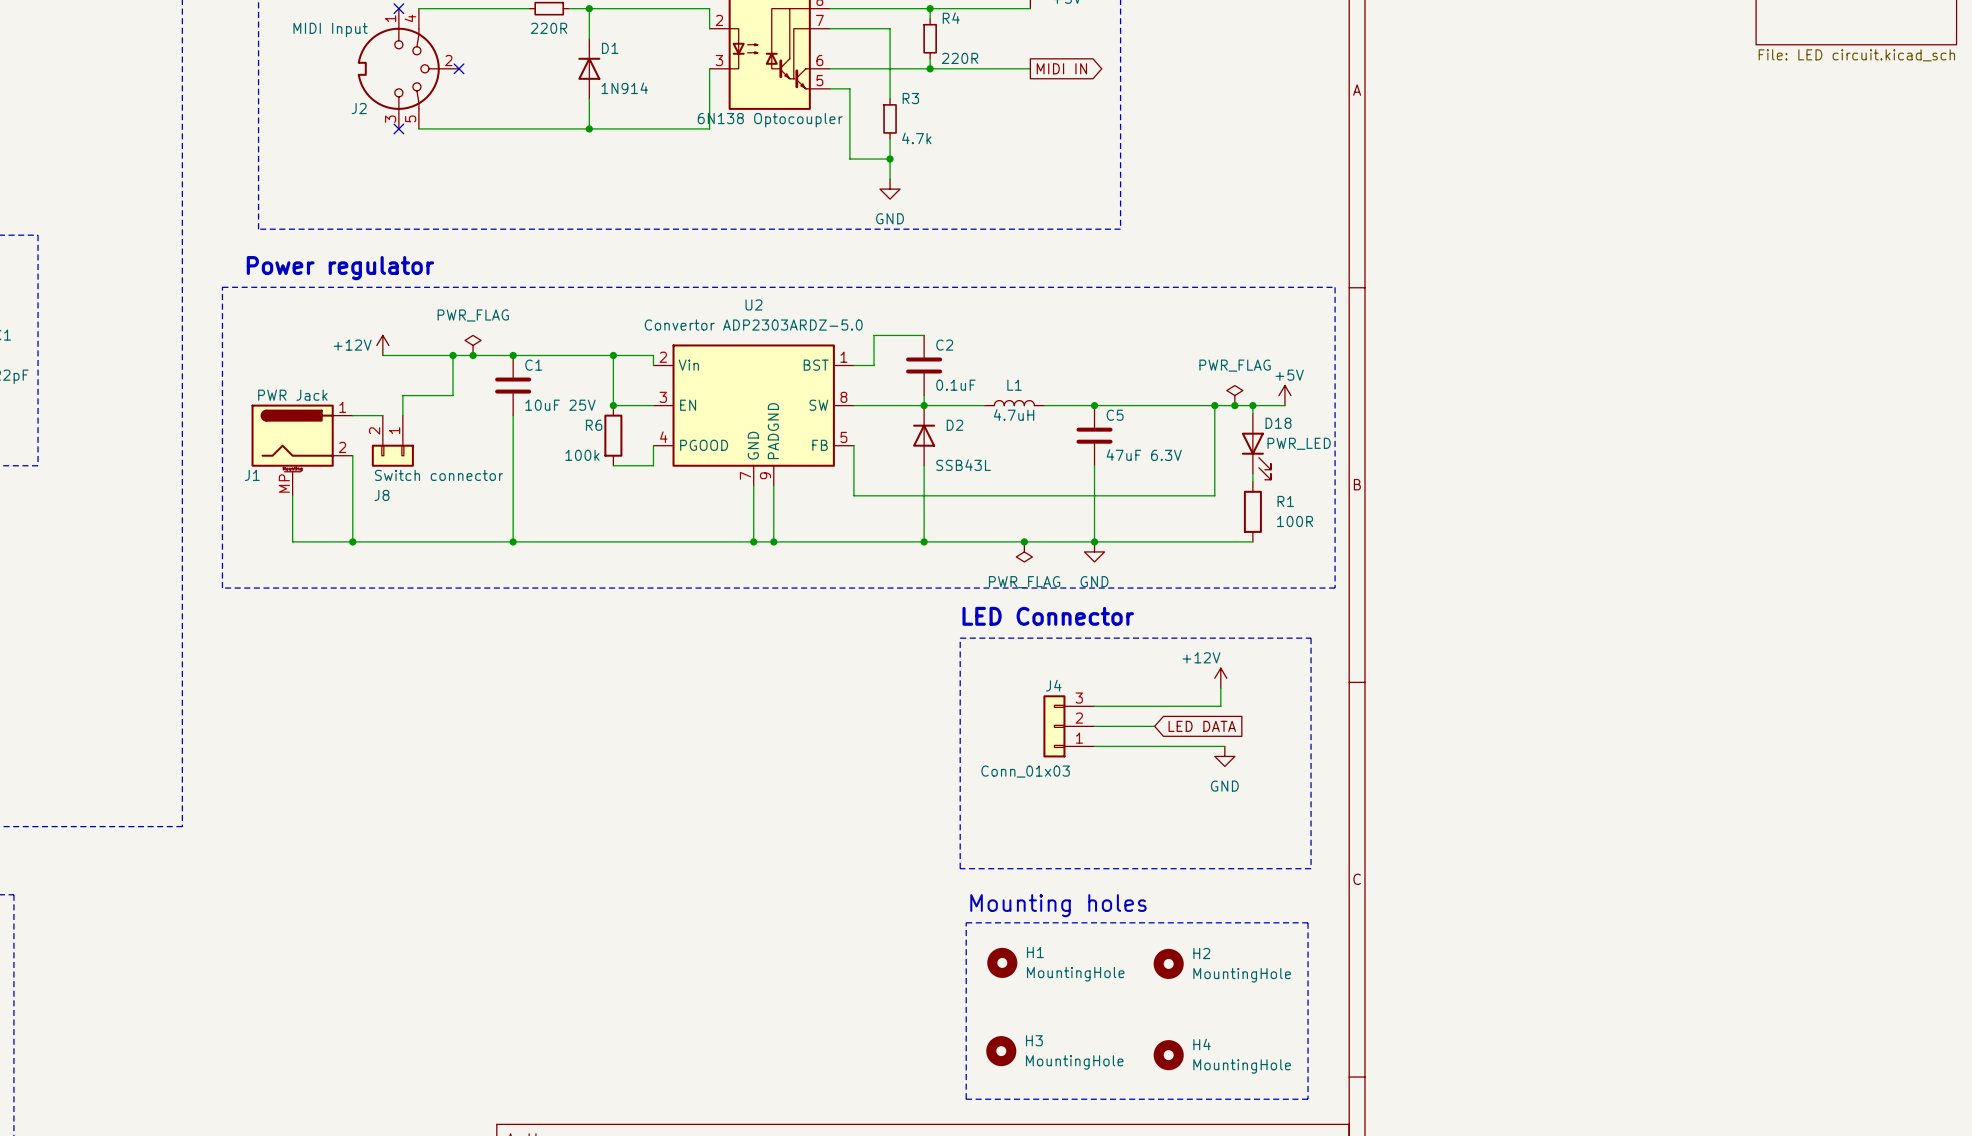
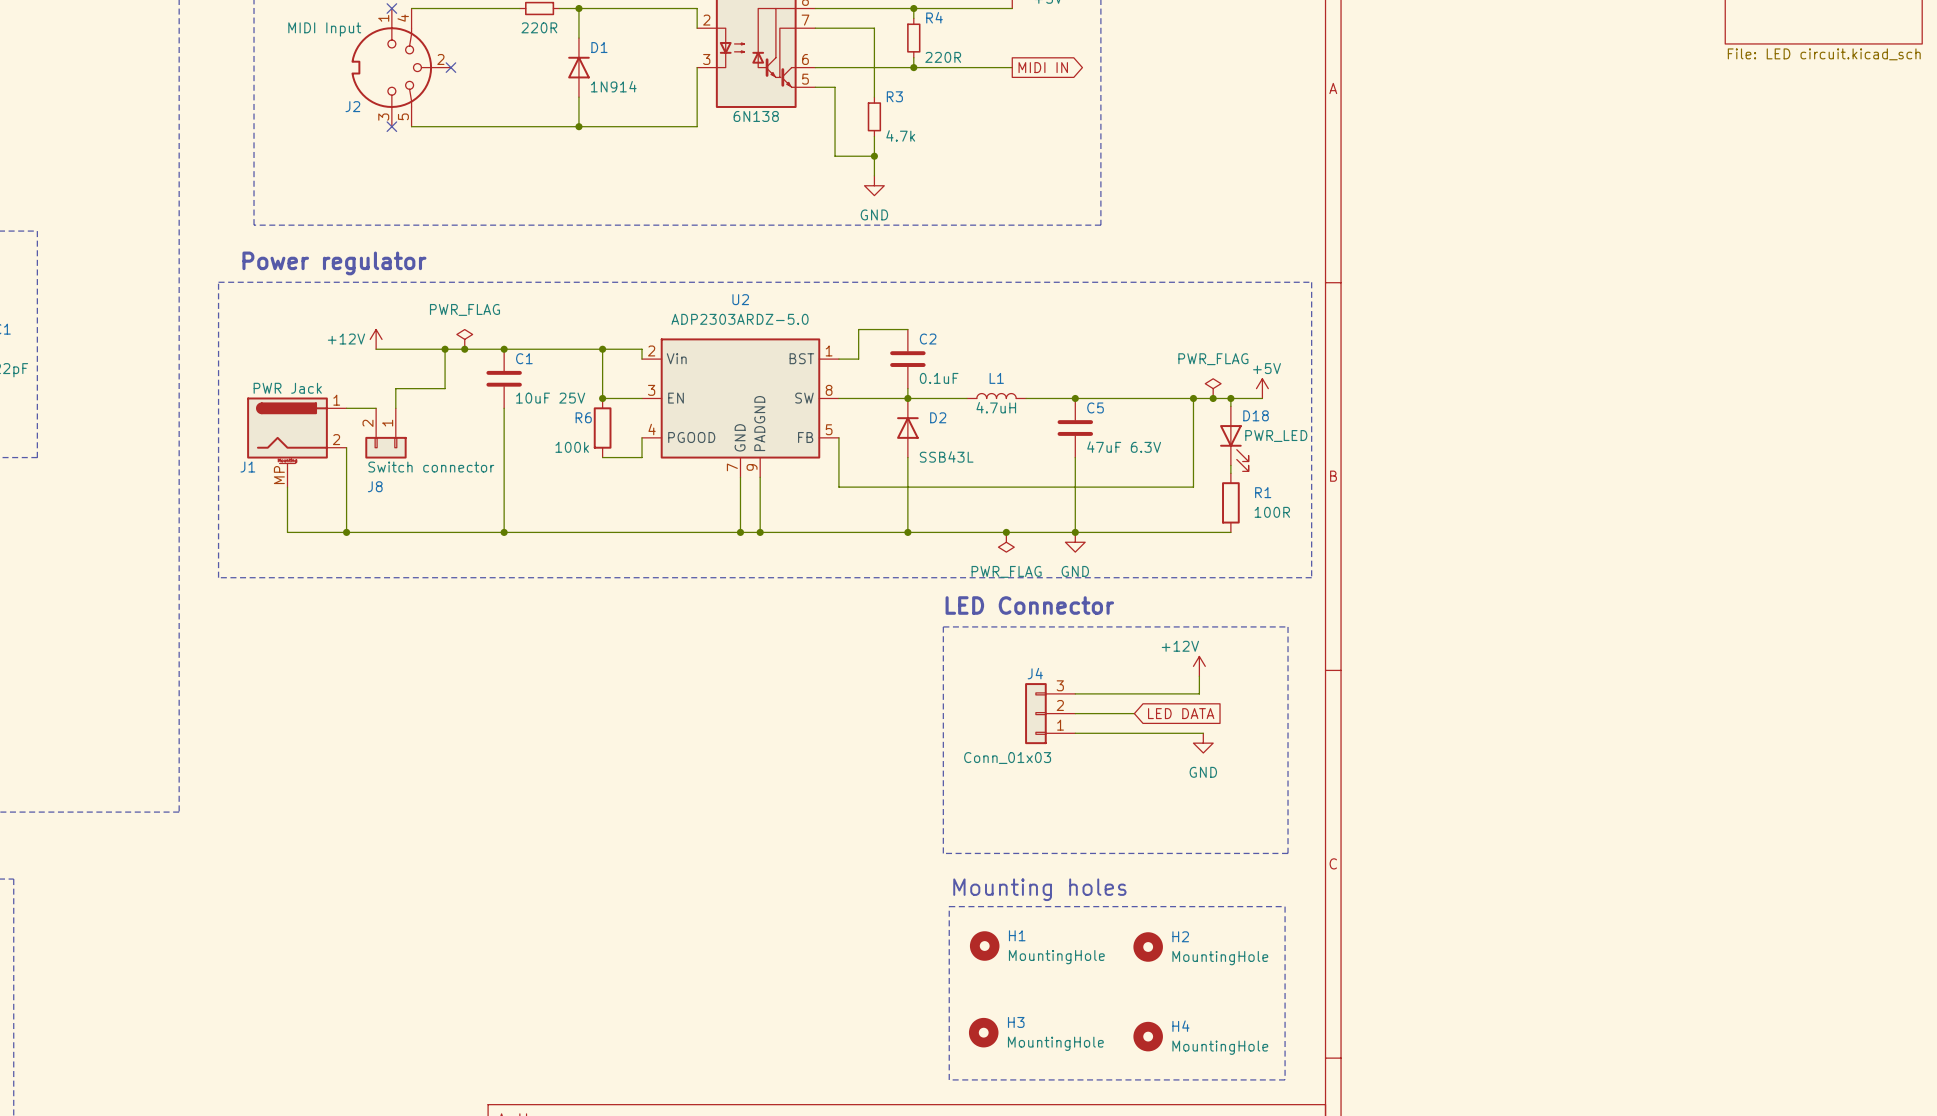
part value: 6N138 Optocoupler (770, 120) -> 6N138 (756, 116)
U2 value: Convertor ADP2303ARDZ-5.0 (753, 325) -> ADP2303ARDZ-5.0 (740, 319)

